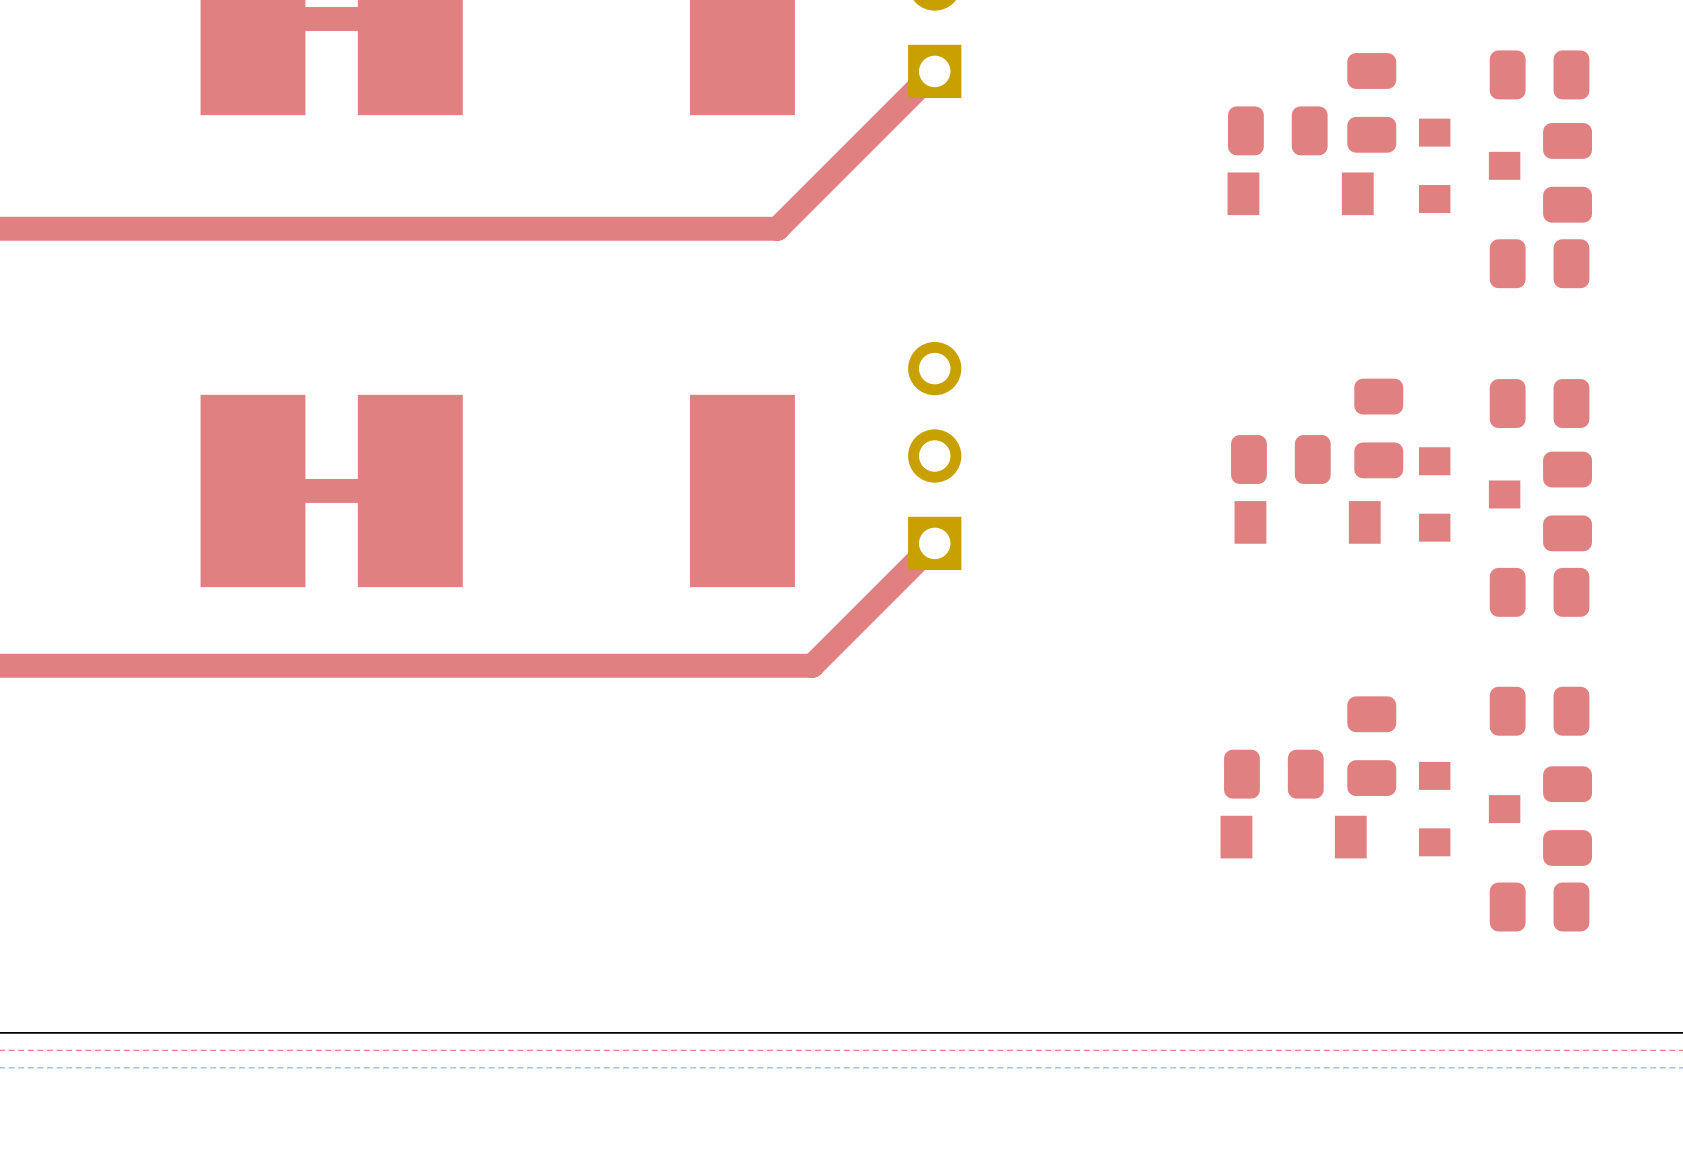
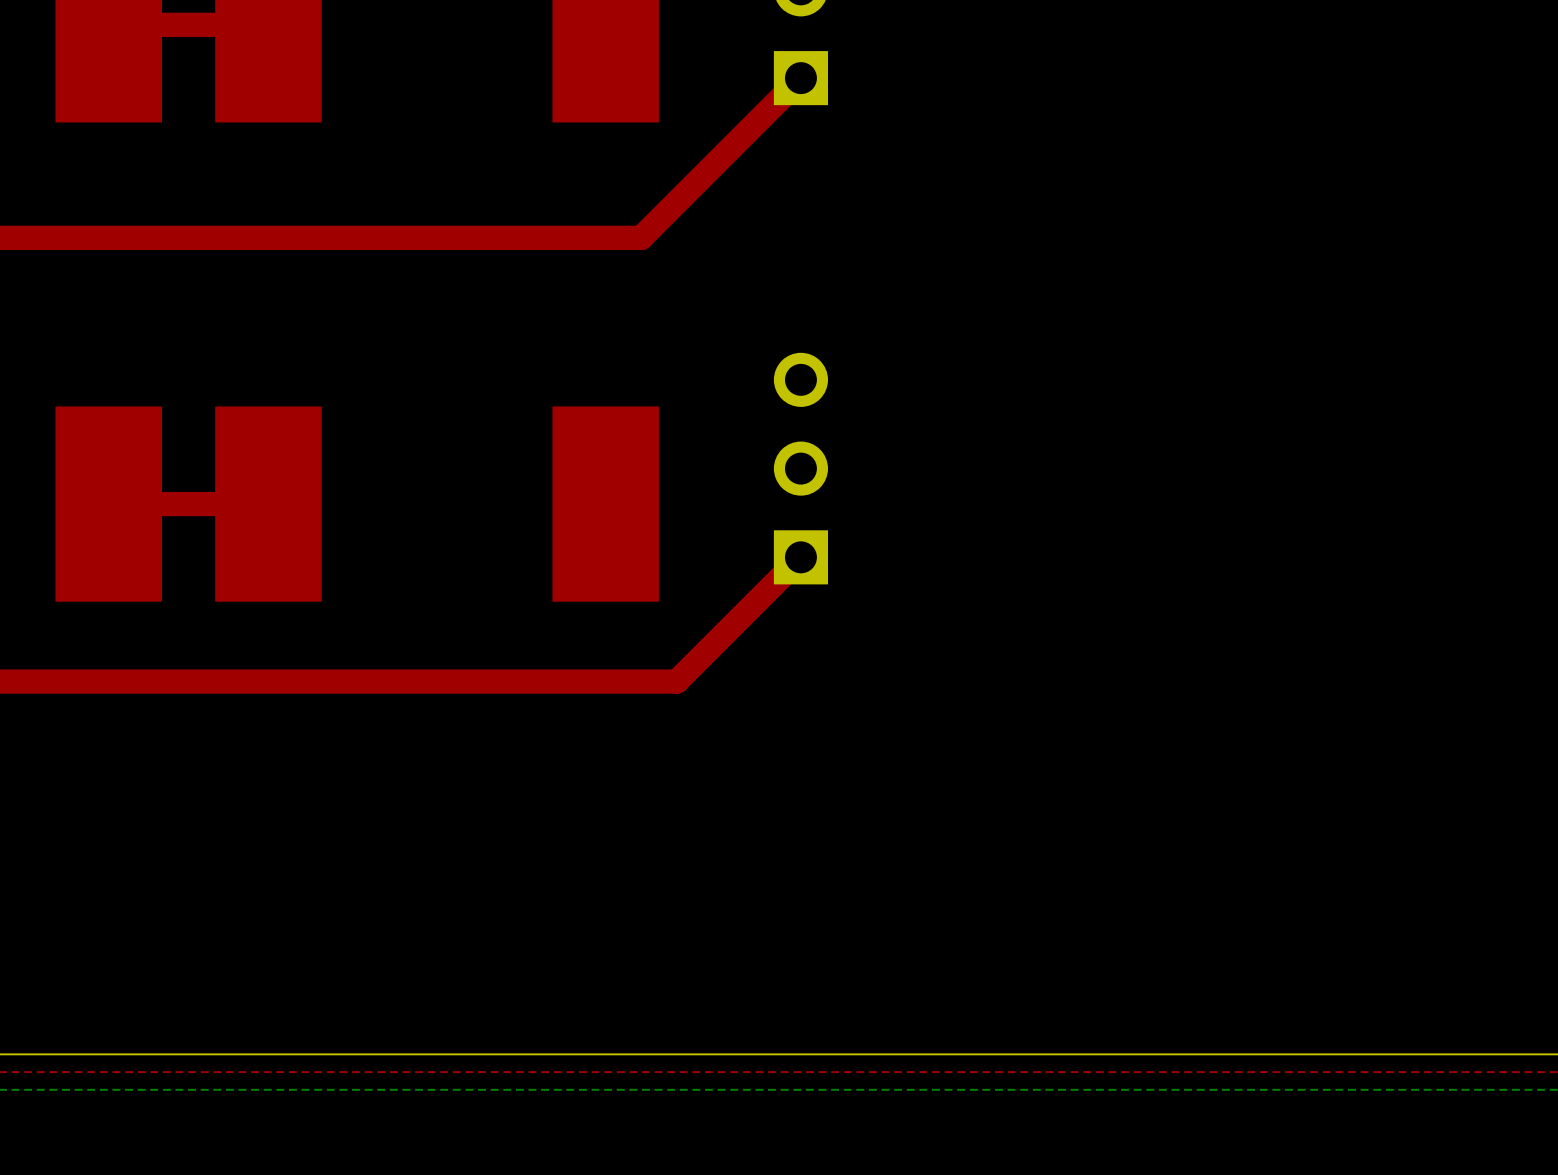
part: (1539, 74) -> none
part: (1371, 102) -> none
part: (1277, 130) -> none
part: (1469, 165) -> none
part: (1567, 172) -> none
part: (1300, 193) -> none
part: (1539, 263) -> none
part: (1539, 403) -> none
part: (1378, 428) -> none
part: (1280, 459) -> none
part: (1469, 494) -> none
part: (1567, 501) -> none
part: (1307, 522) -> none
part: (1539, 592) -> none
part: (1539, 711) -> none
part: (1371, 746) -> none
part: (1273, 774) -> none
part: (1469, 809) -> none
part: (1567, 816) -> none
part: (1293, 837) -> none
part: (1539, 907) -> none

